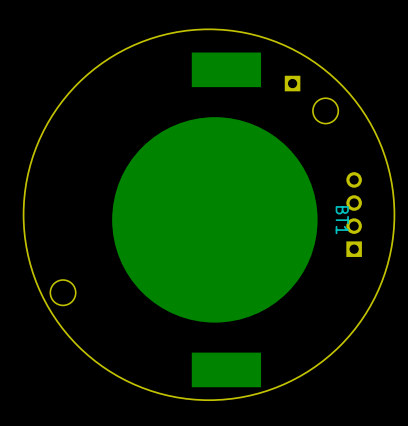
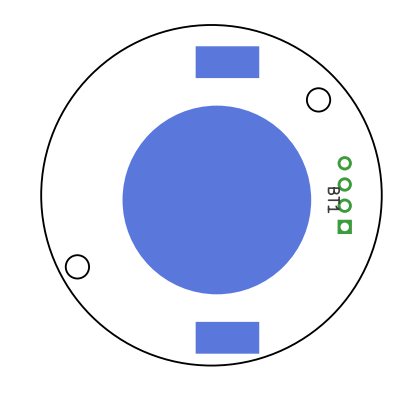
part: (292, 83) -> none

